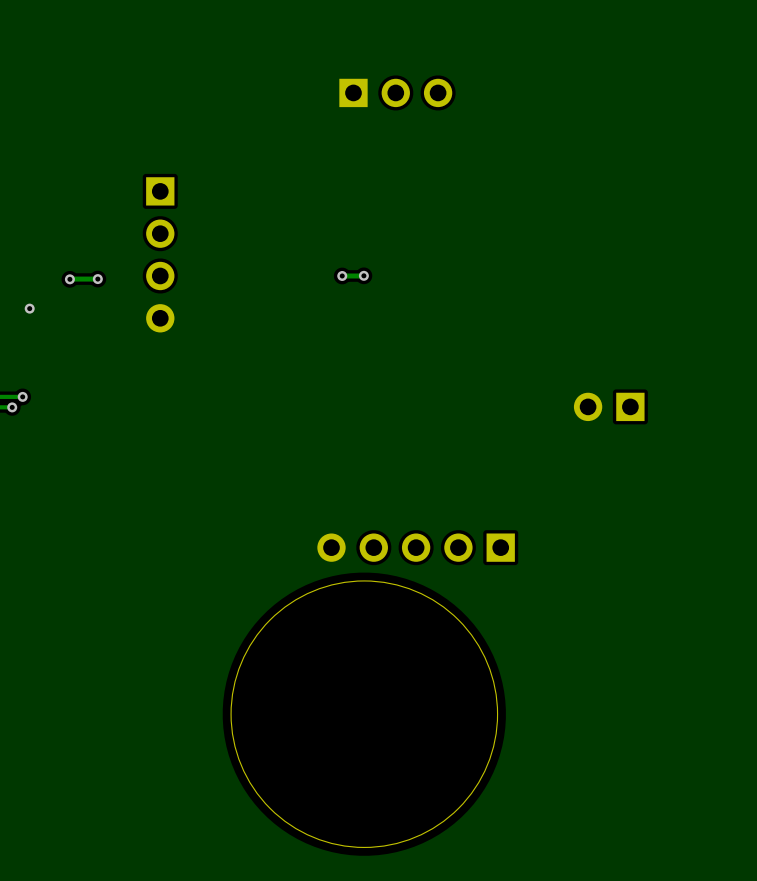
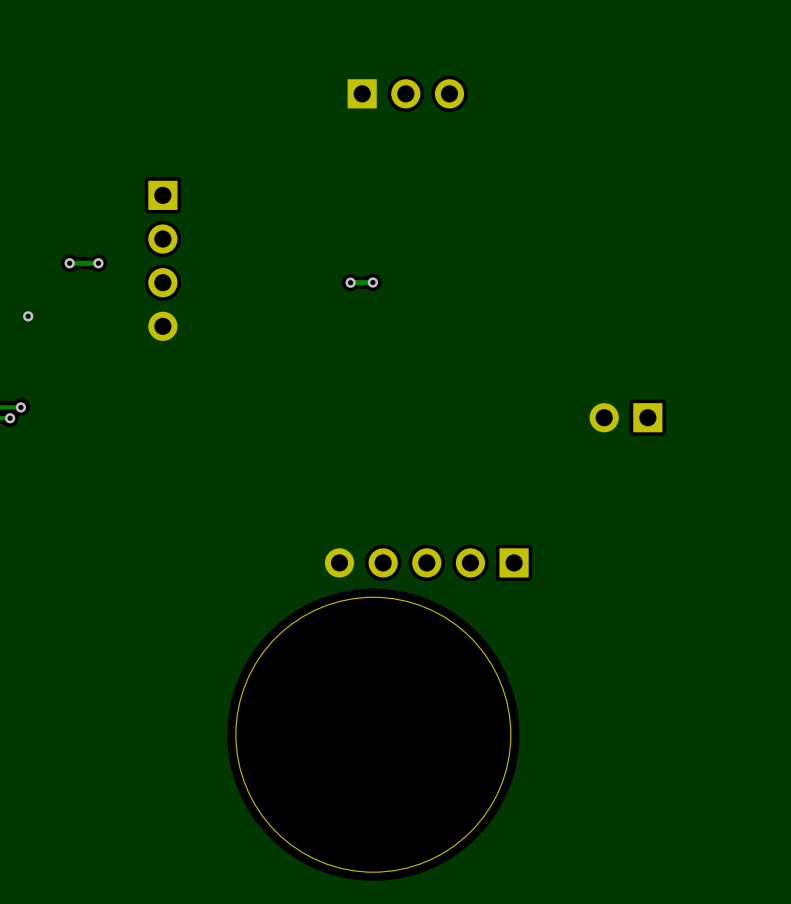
via: none -> (69, 263)
track: none -> (98, 263) (69, 263)
via: none -> (98, 263)
via: (69, 279) -> none
track: (97, 279) (69, 279) -> none
via: (97, 279) -> none

